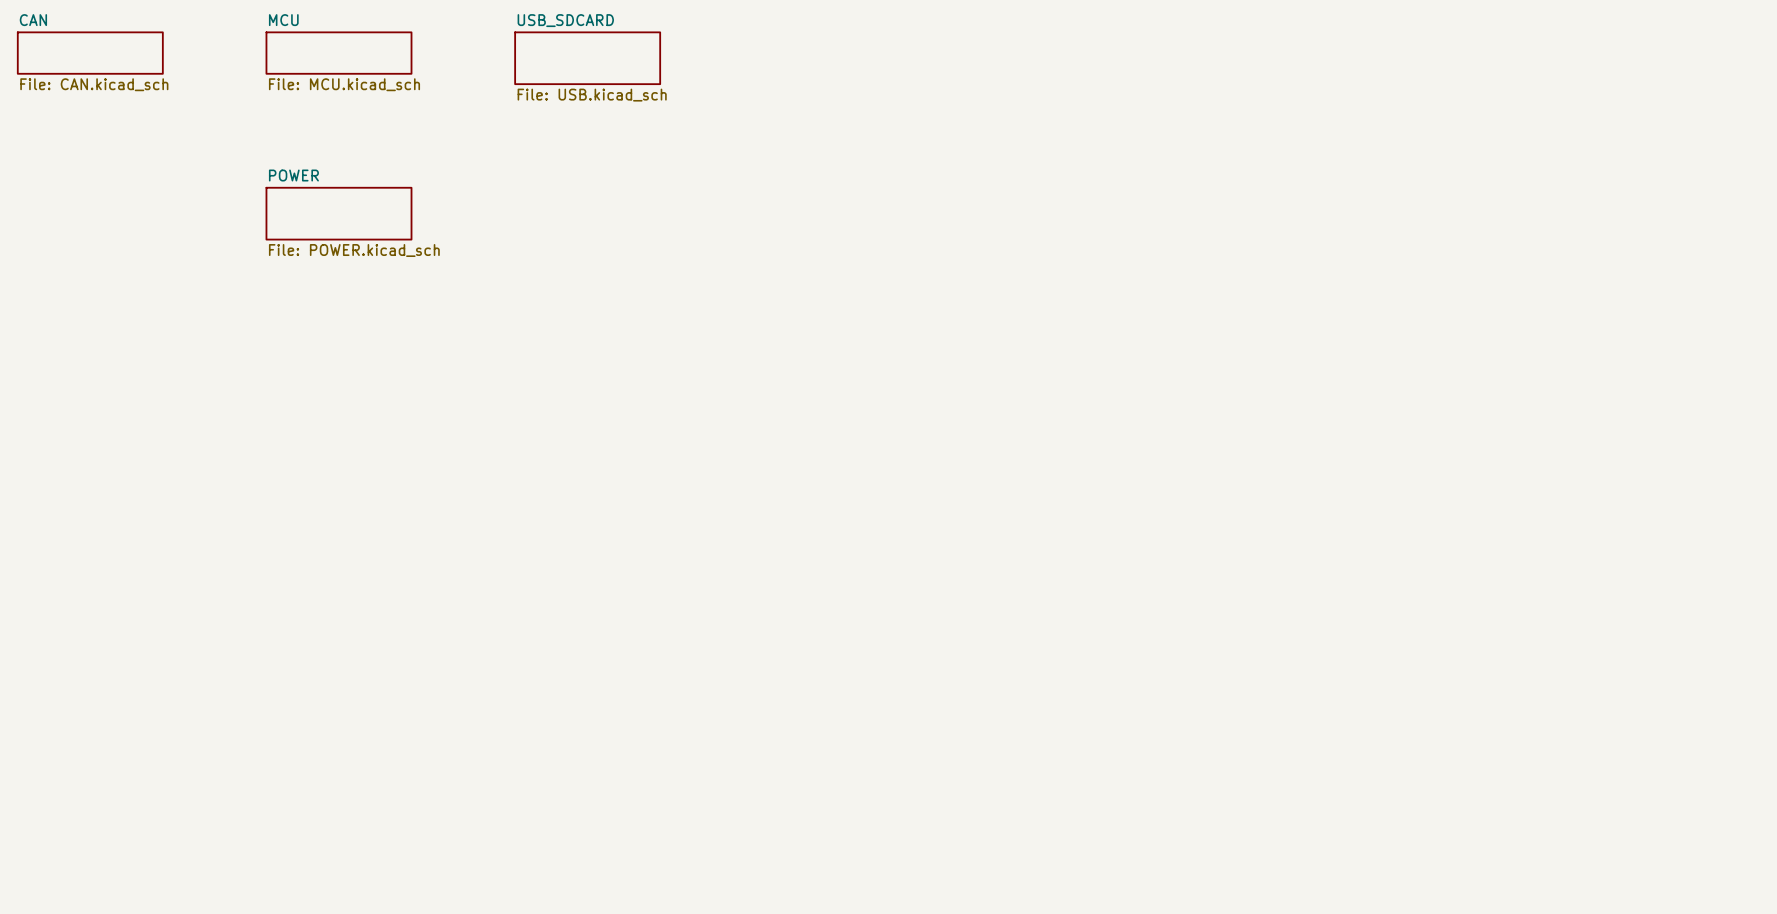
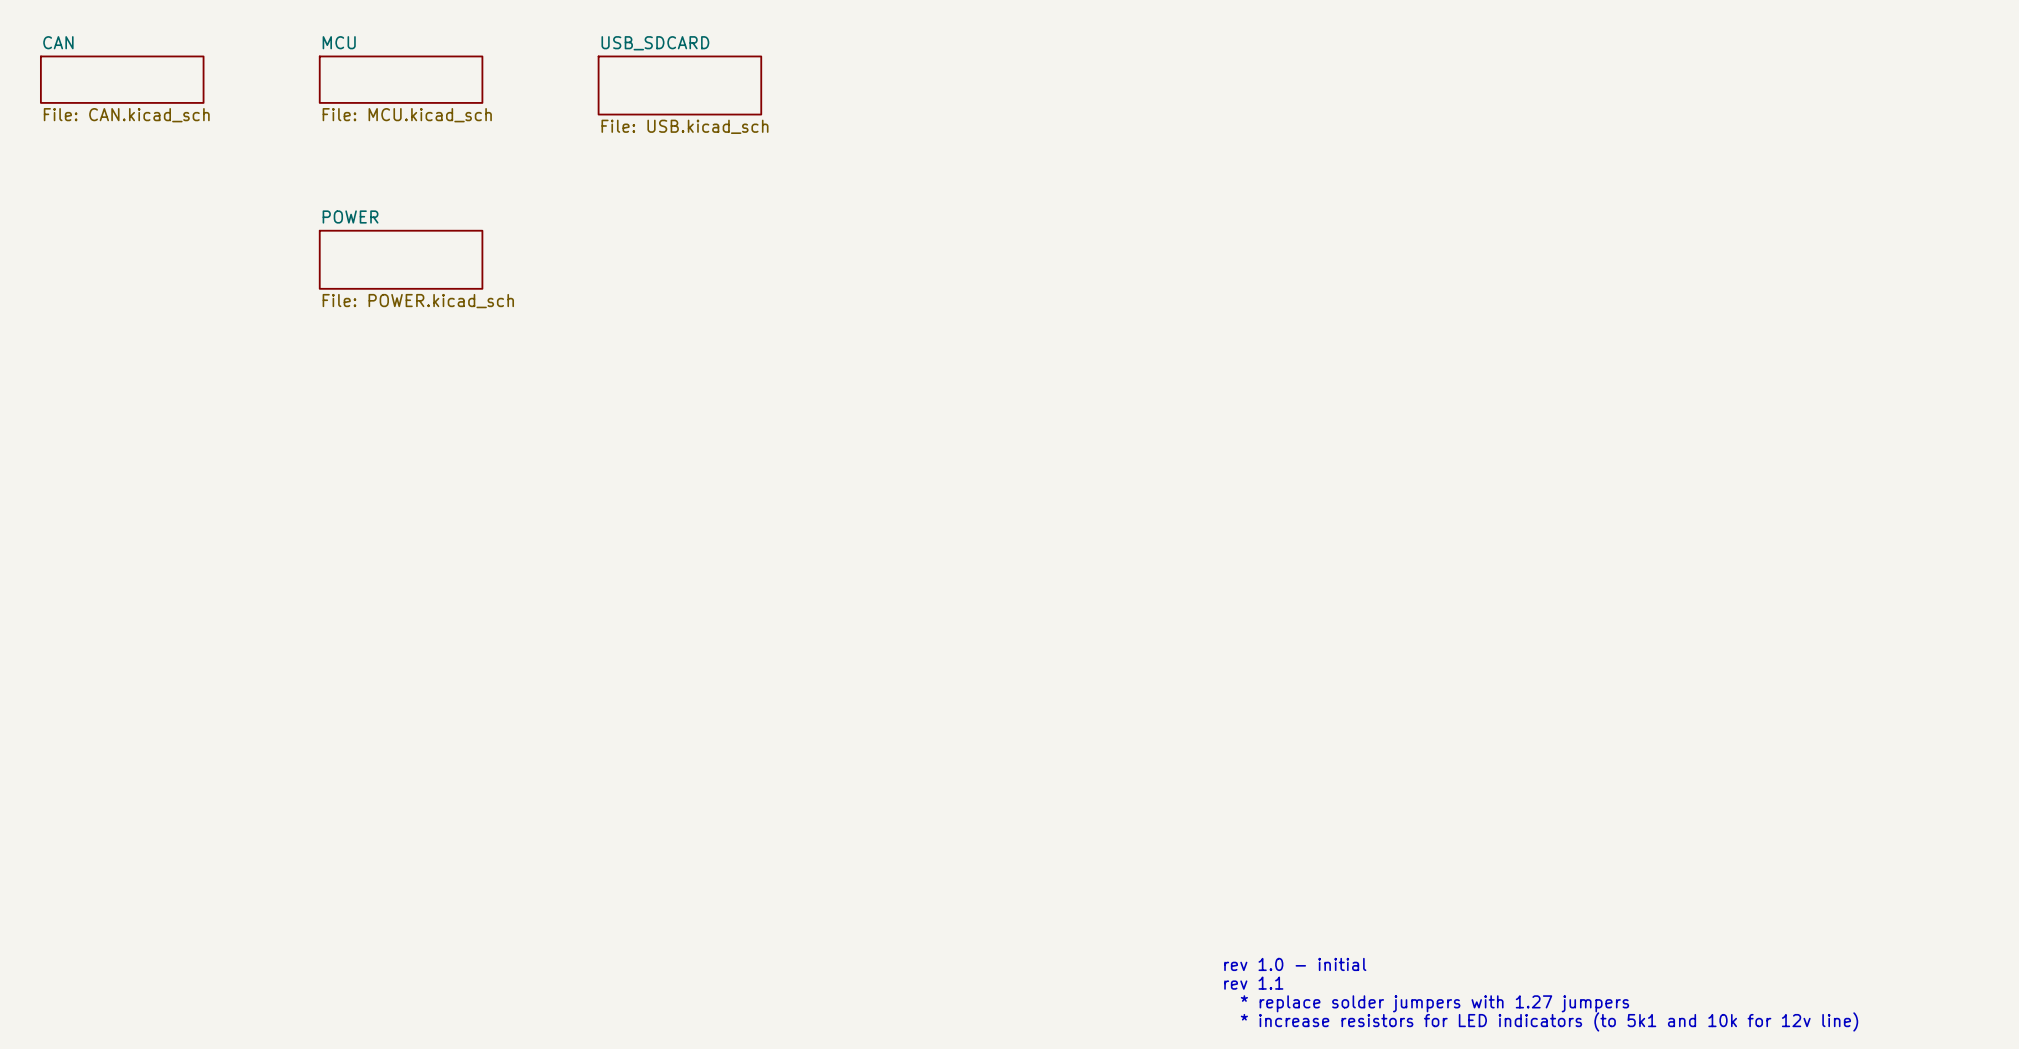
text: none -> rev 1.0 - initial (1295, 964)
text: none -> rev 1.1 (1253, 983)
text: none -> * replace solder jumpers with 1.27 jumpers (1434, 1003)
text: none -> * increase resistors for LED indicators (to 5k1 and 10k for 12v line) (1549, 1021)

